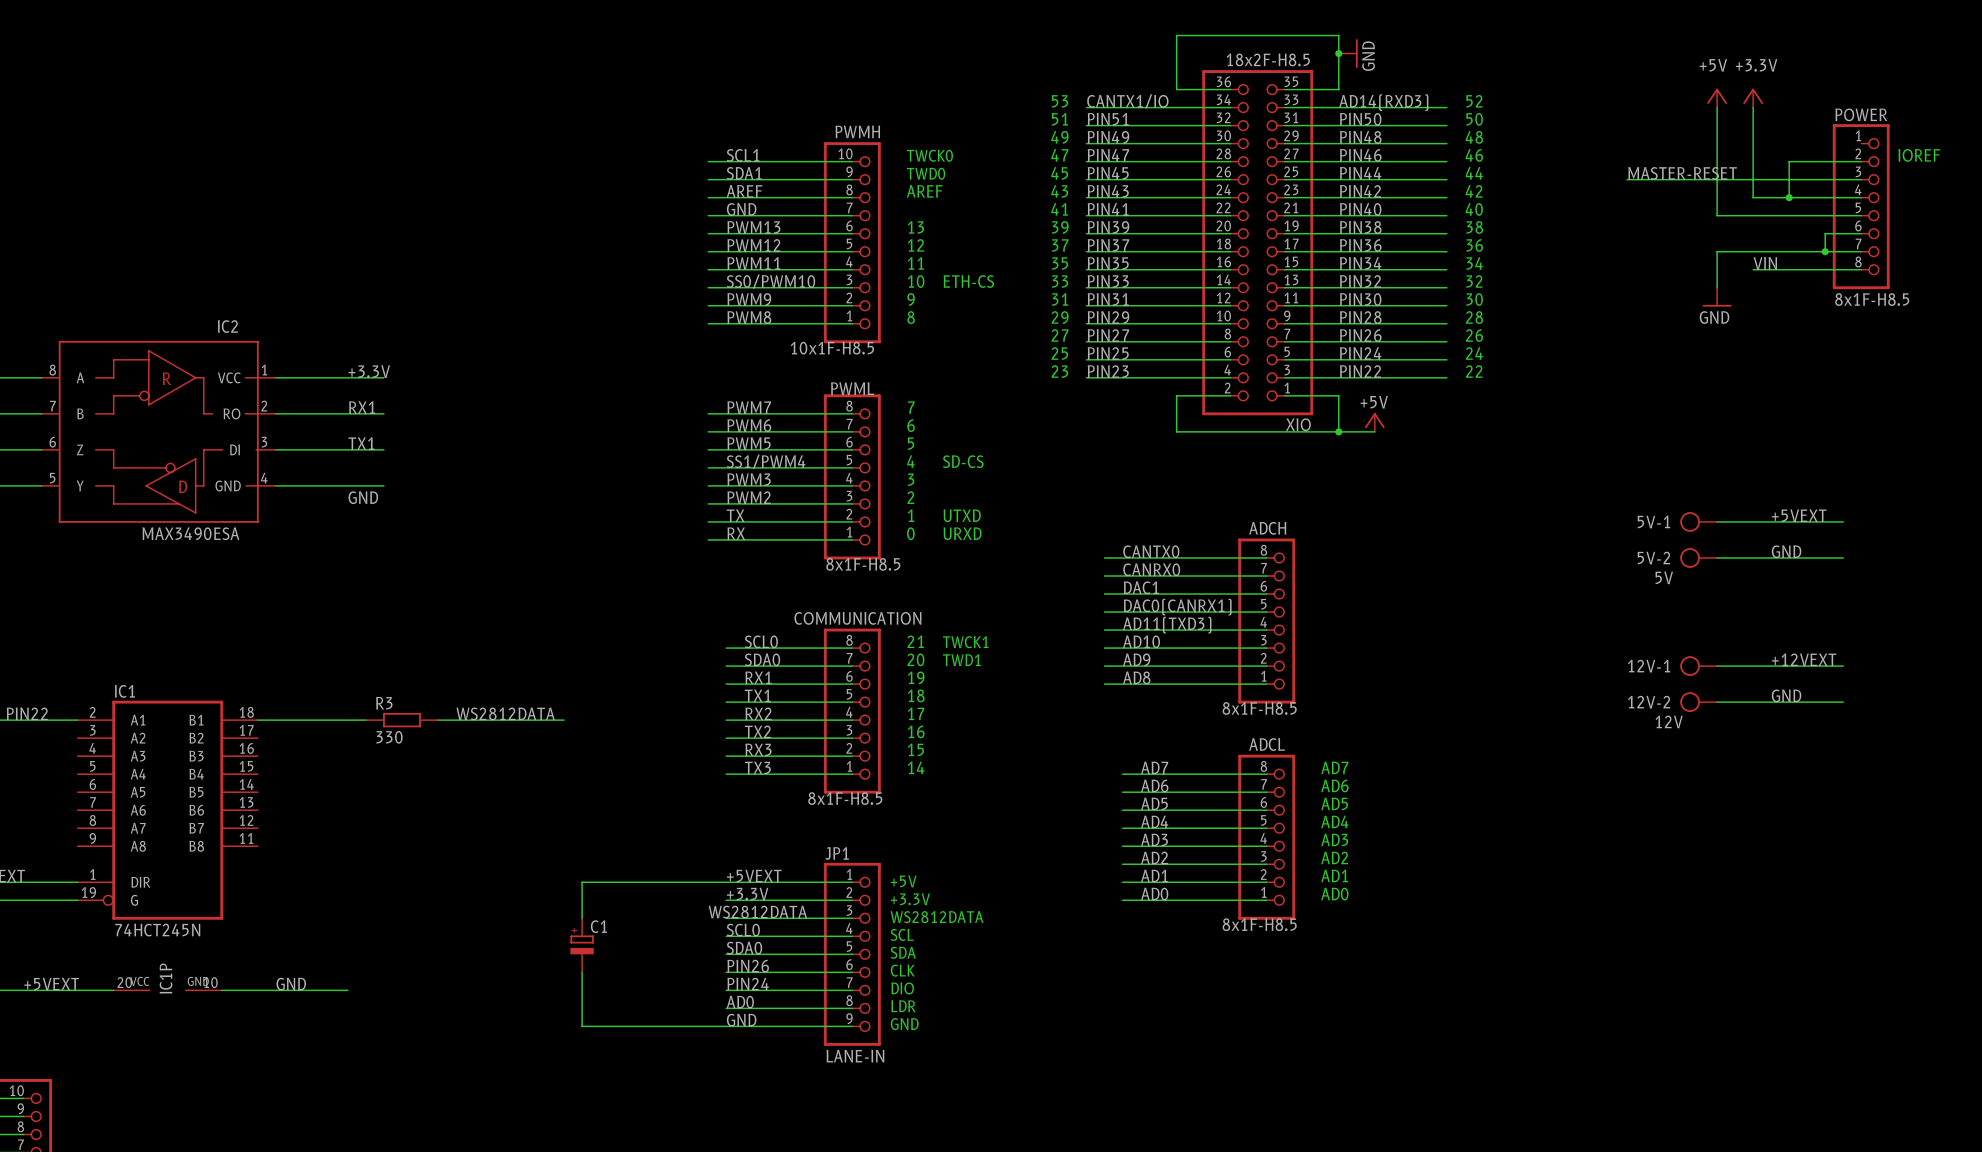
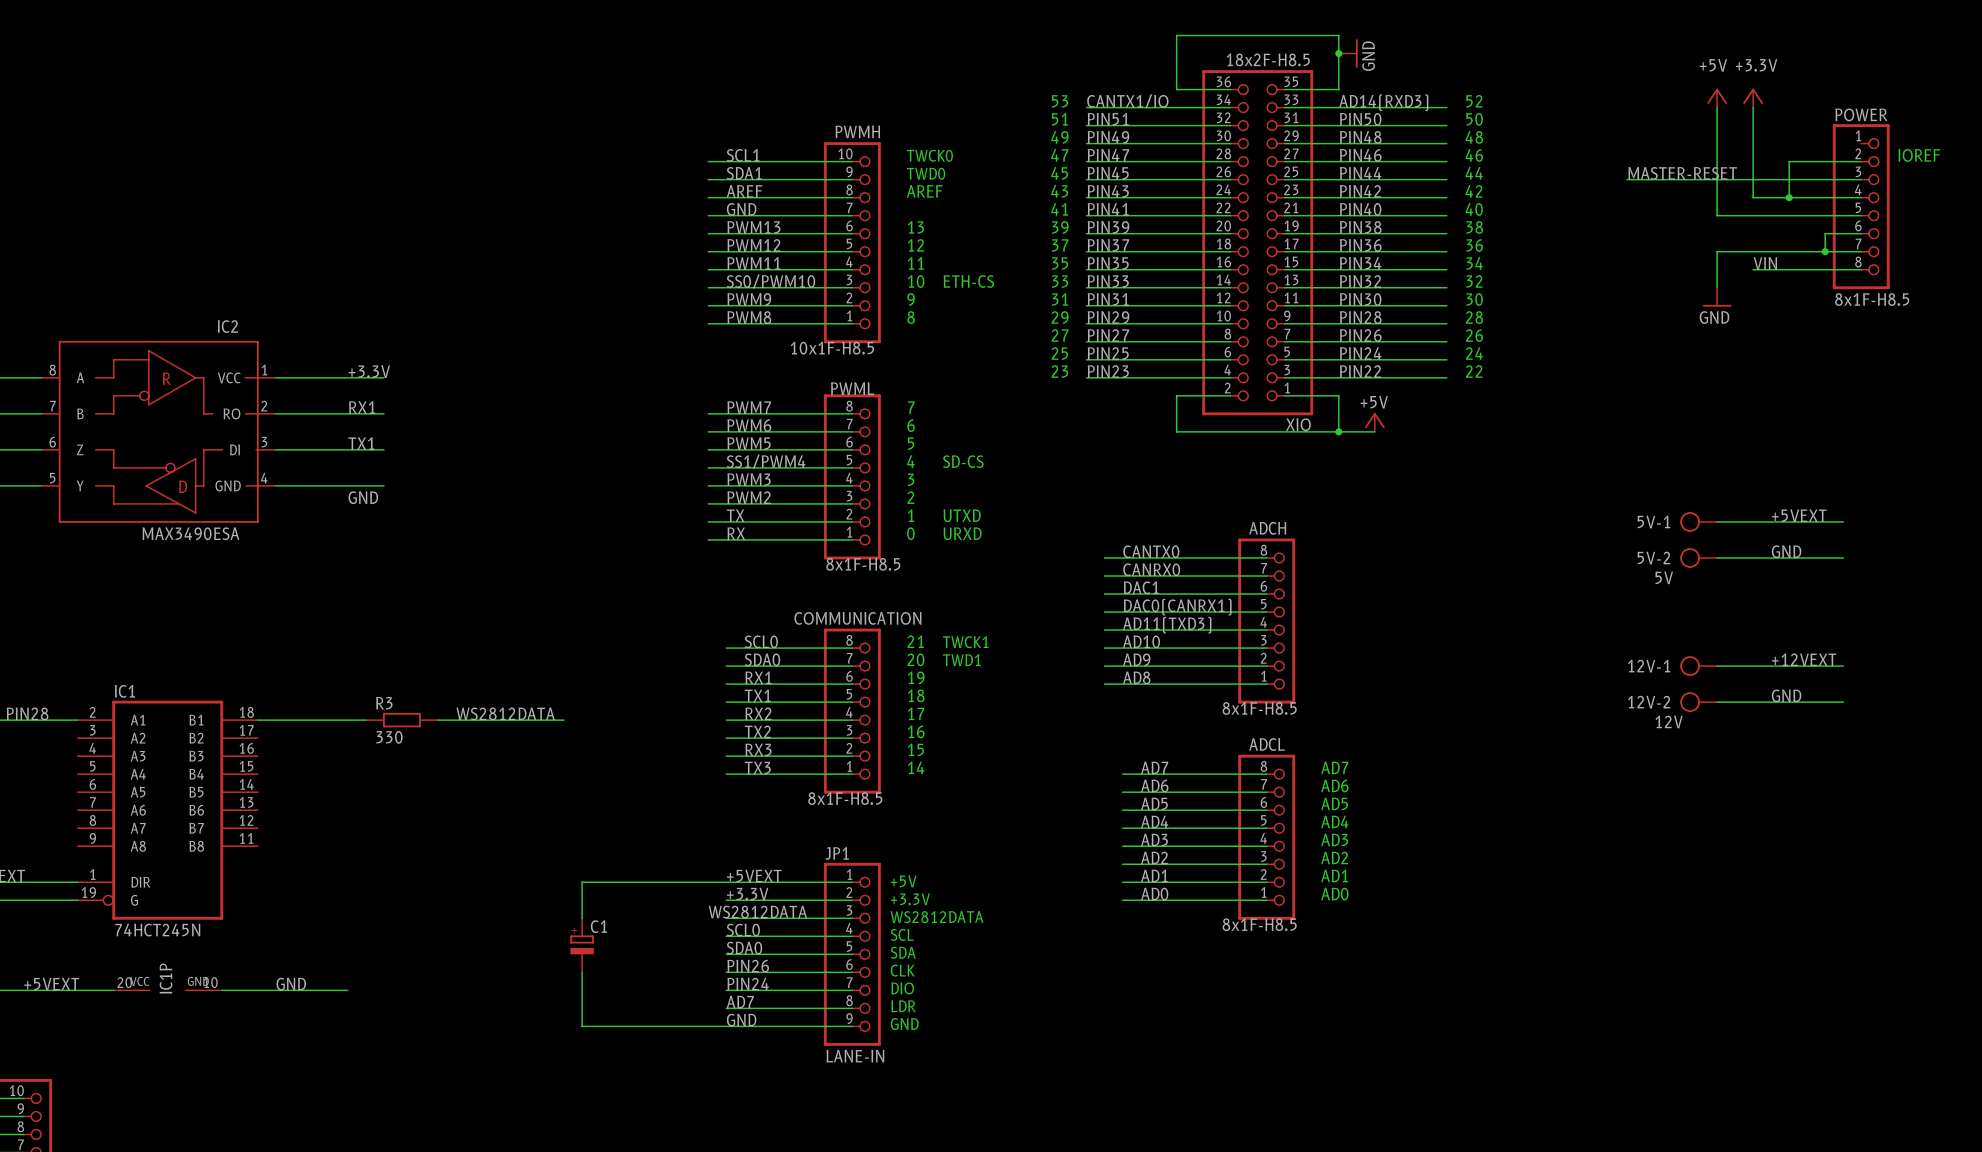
label: PIN22 (27, 713) -> PIN28 (27, 713)
label: AD0 (740, 1002) -> AD7 (740, 1002)

